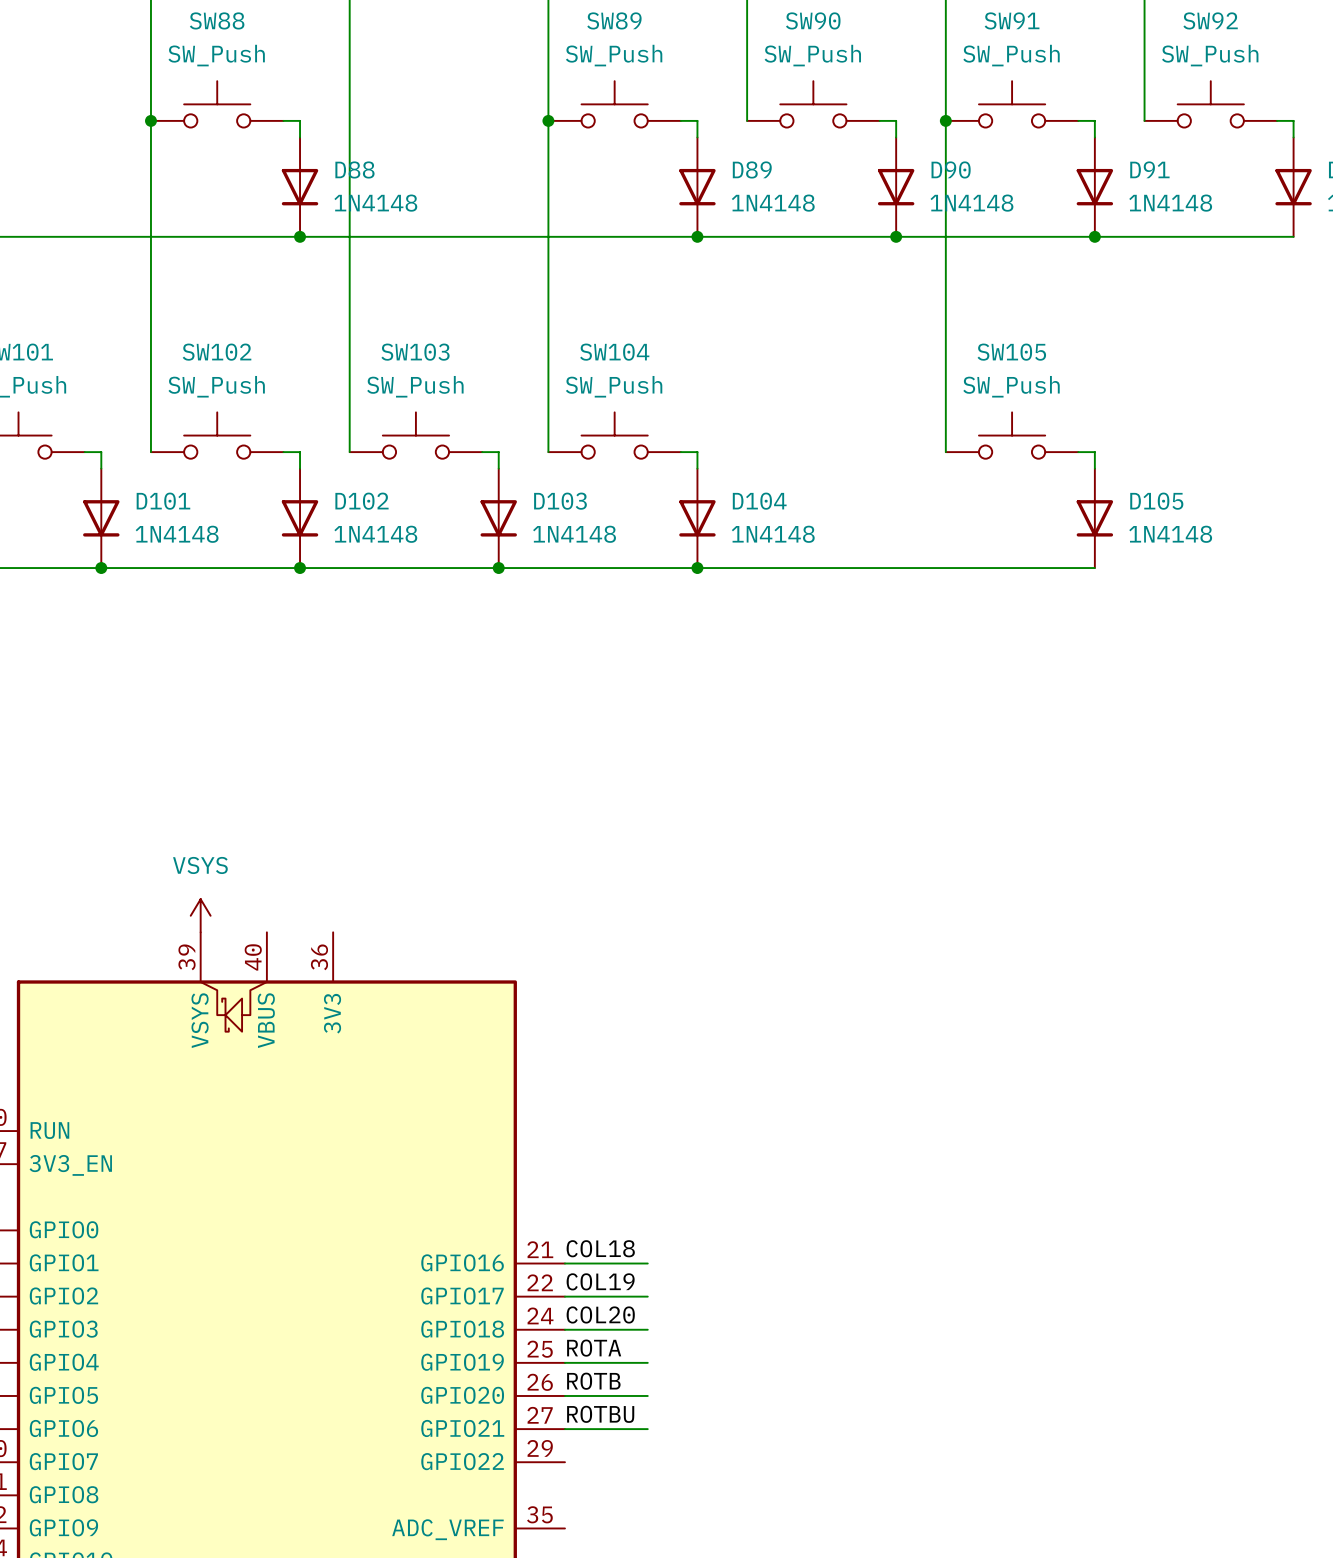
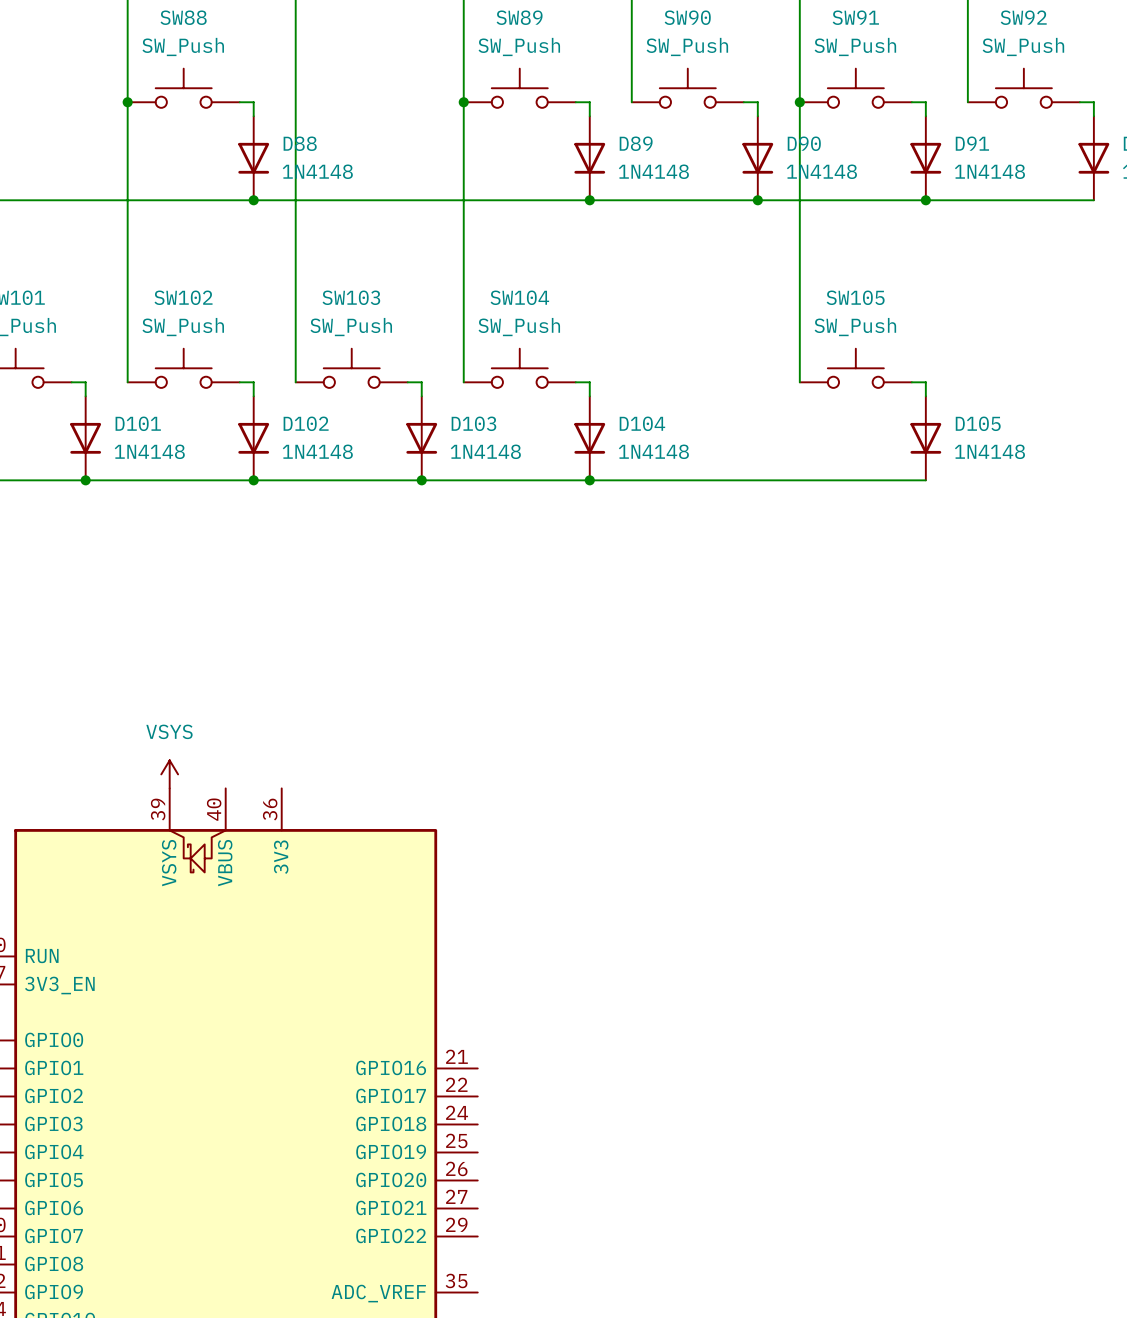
label: COL18 (600, 1248) -> none
wire: (564, 1263) (647, 1263) -> none
label: COL19 (600, 1281) -> none
wire: (564, 1296) (647, 1296) -> none
label: COL20 (600, 1314) -> none
wire: (564, 1329) (647, 1329) -> none
label: ROTA (594, 1348) -> none
wire: (564, 1362) (647, 1362) -> none
label: ROTB (593, 1381) -> none
wire: (564, 1395) (647, 1395) -> none
label: ROTBU (600, 1414) -> none
wire: (564, 1429) (647, 1429) -> none

